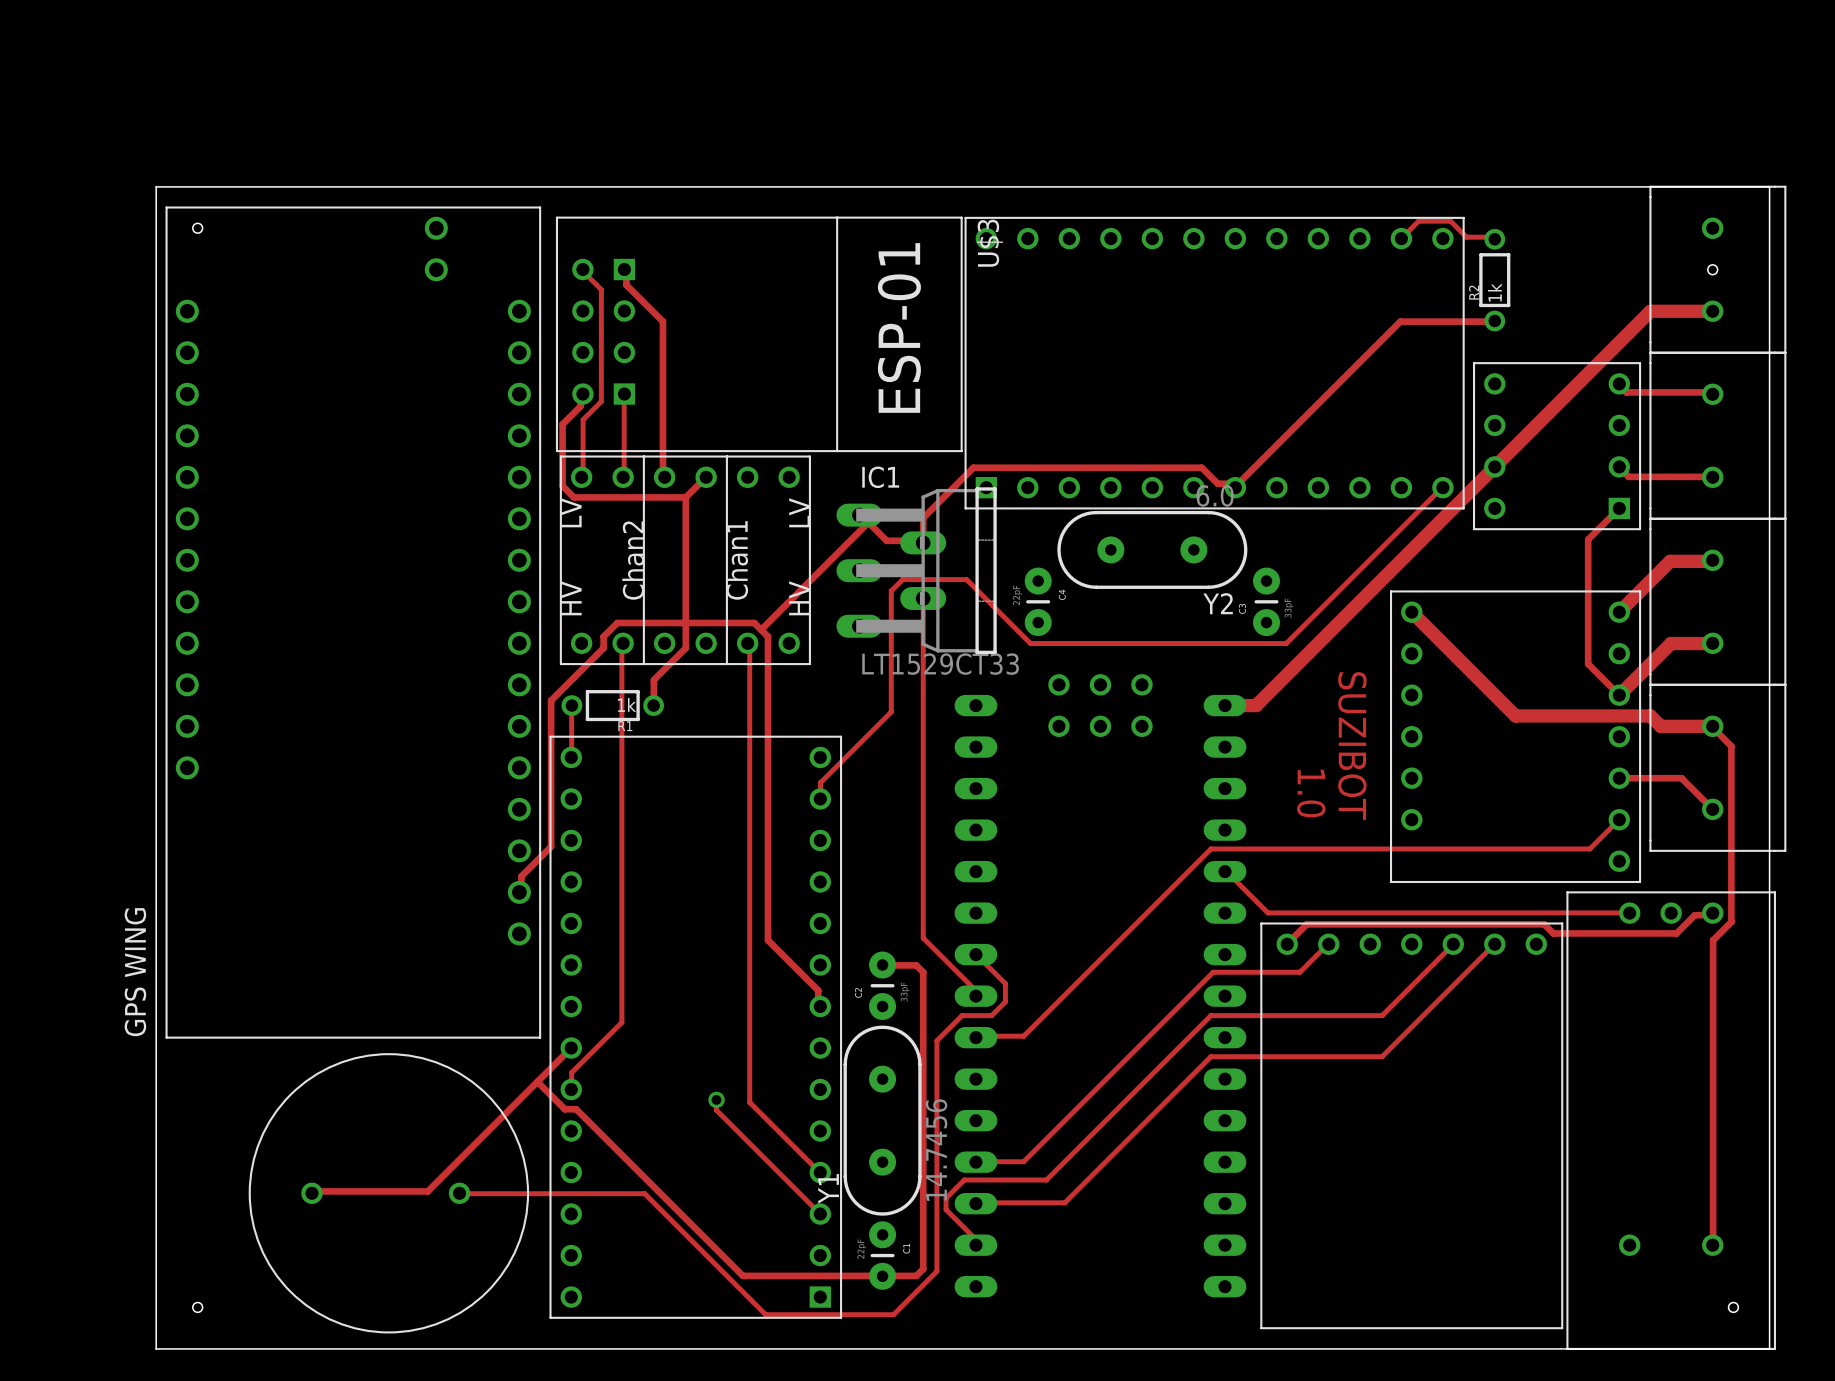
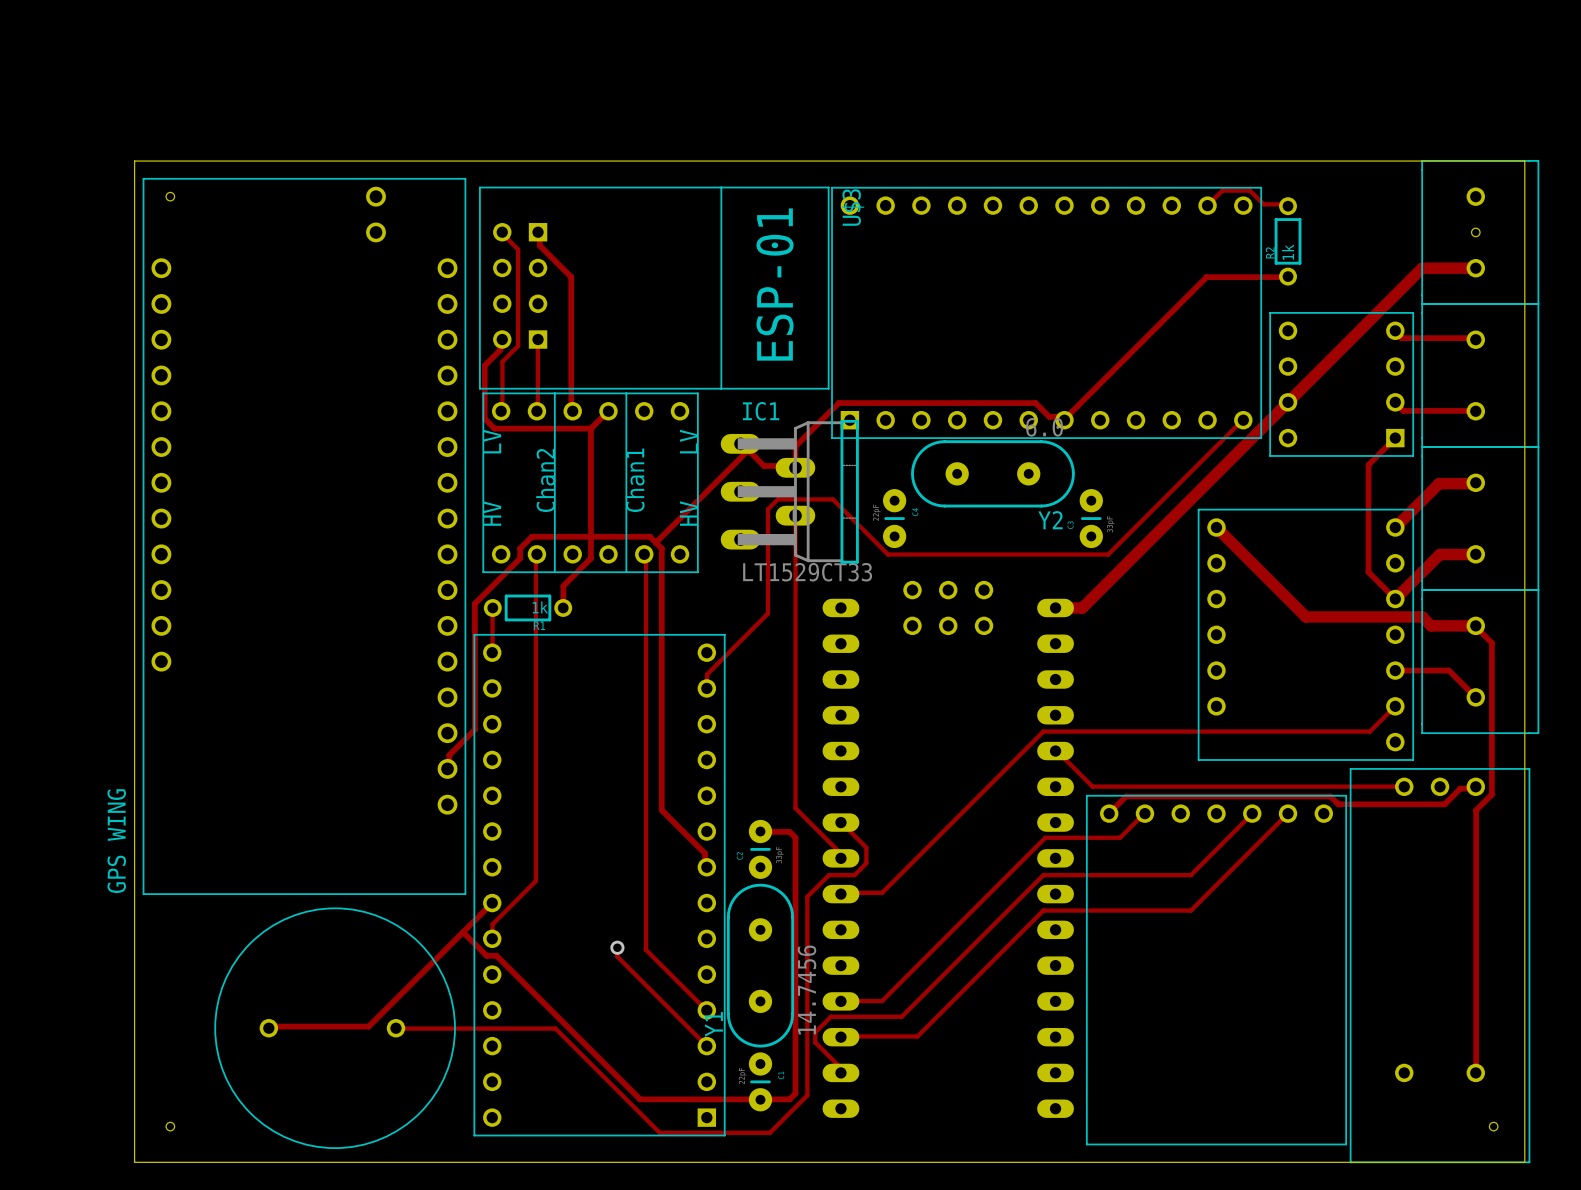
text: SUZIBOT (1352, 745) -> none
text: 1.0 (1311, 793) -> none

